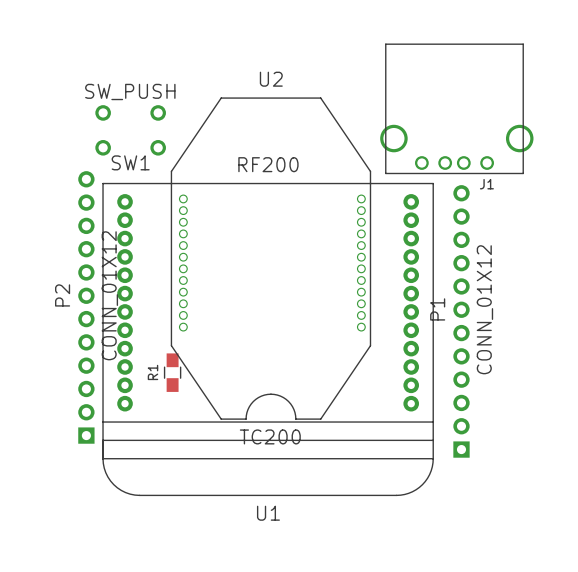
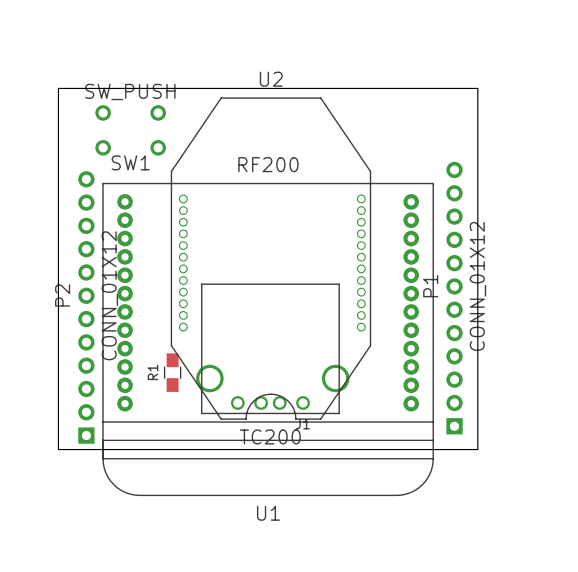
board edge: none -> (58, 88) (477, 88) (477, 449) (58, 449) (58, 88)
J1 position: (456, 108) -> (272, 348)
P1 position: (461, 321) -> (454, 298)

